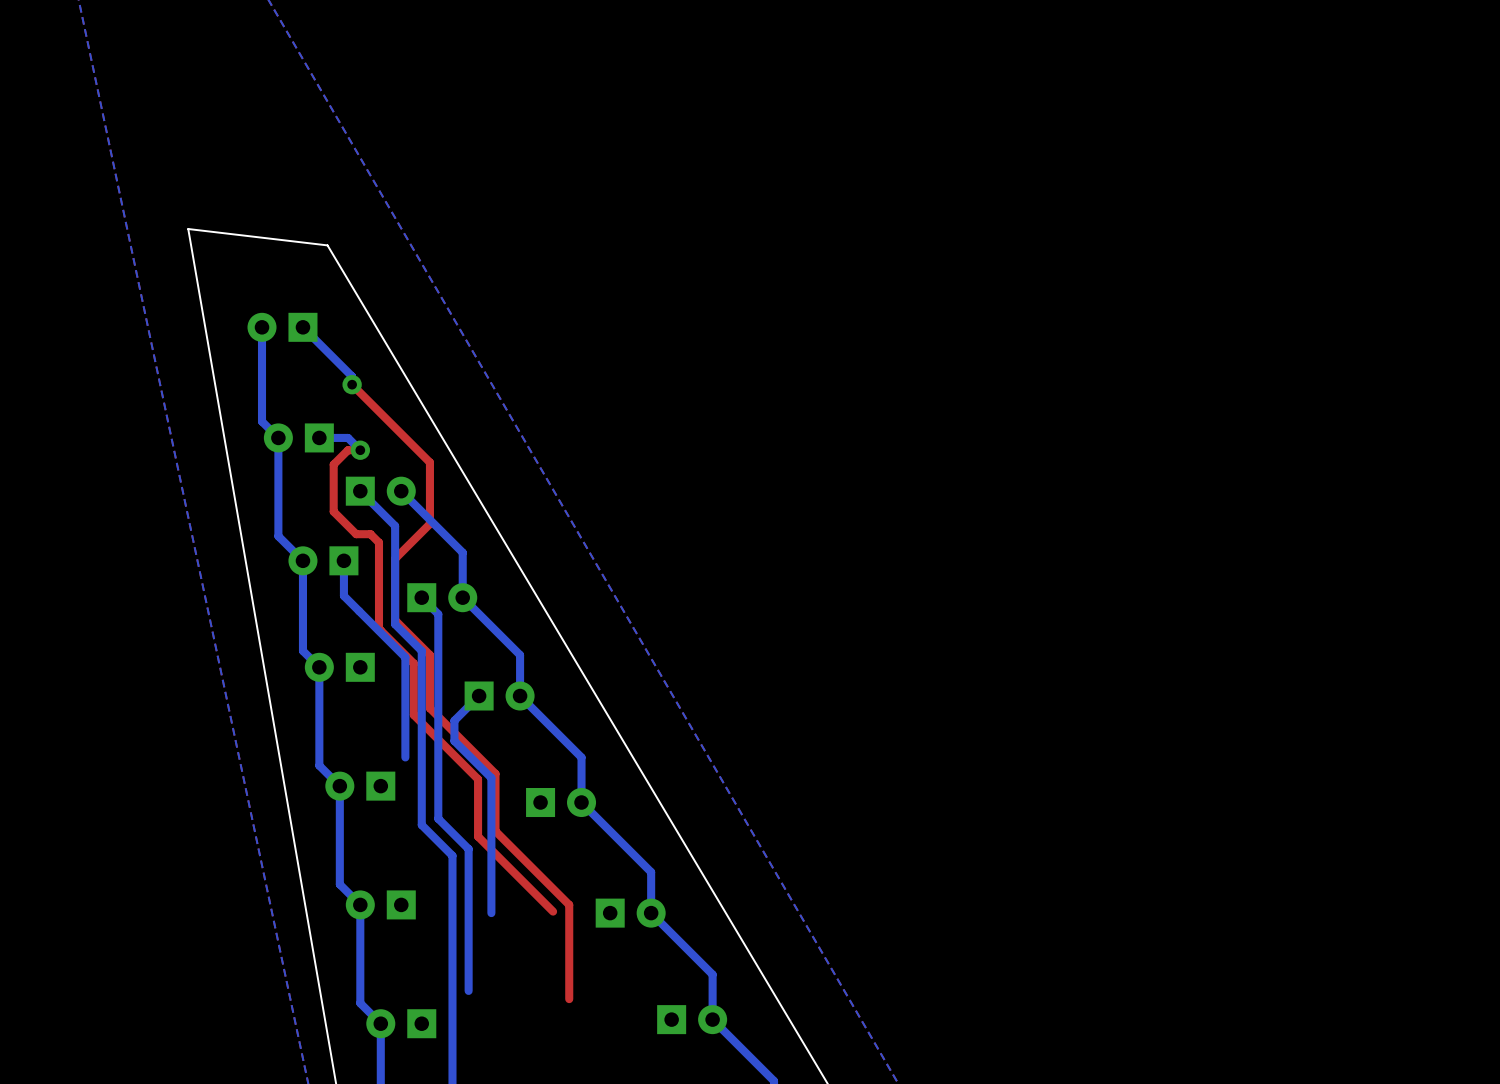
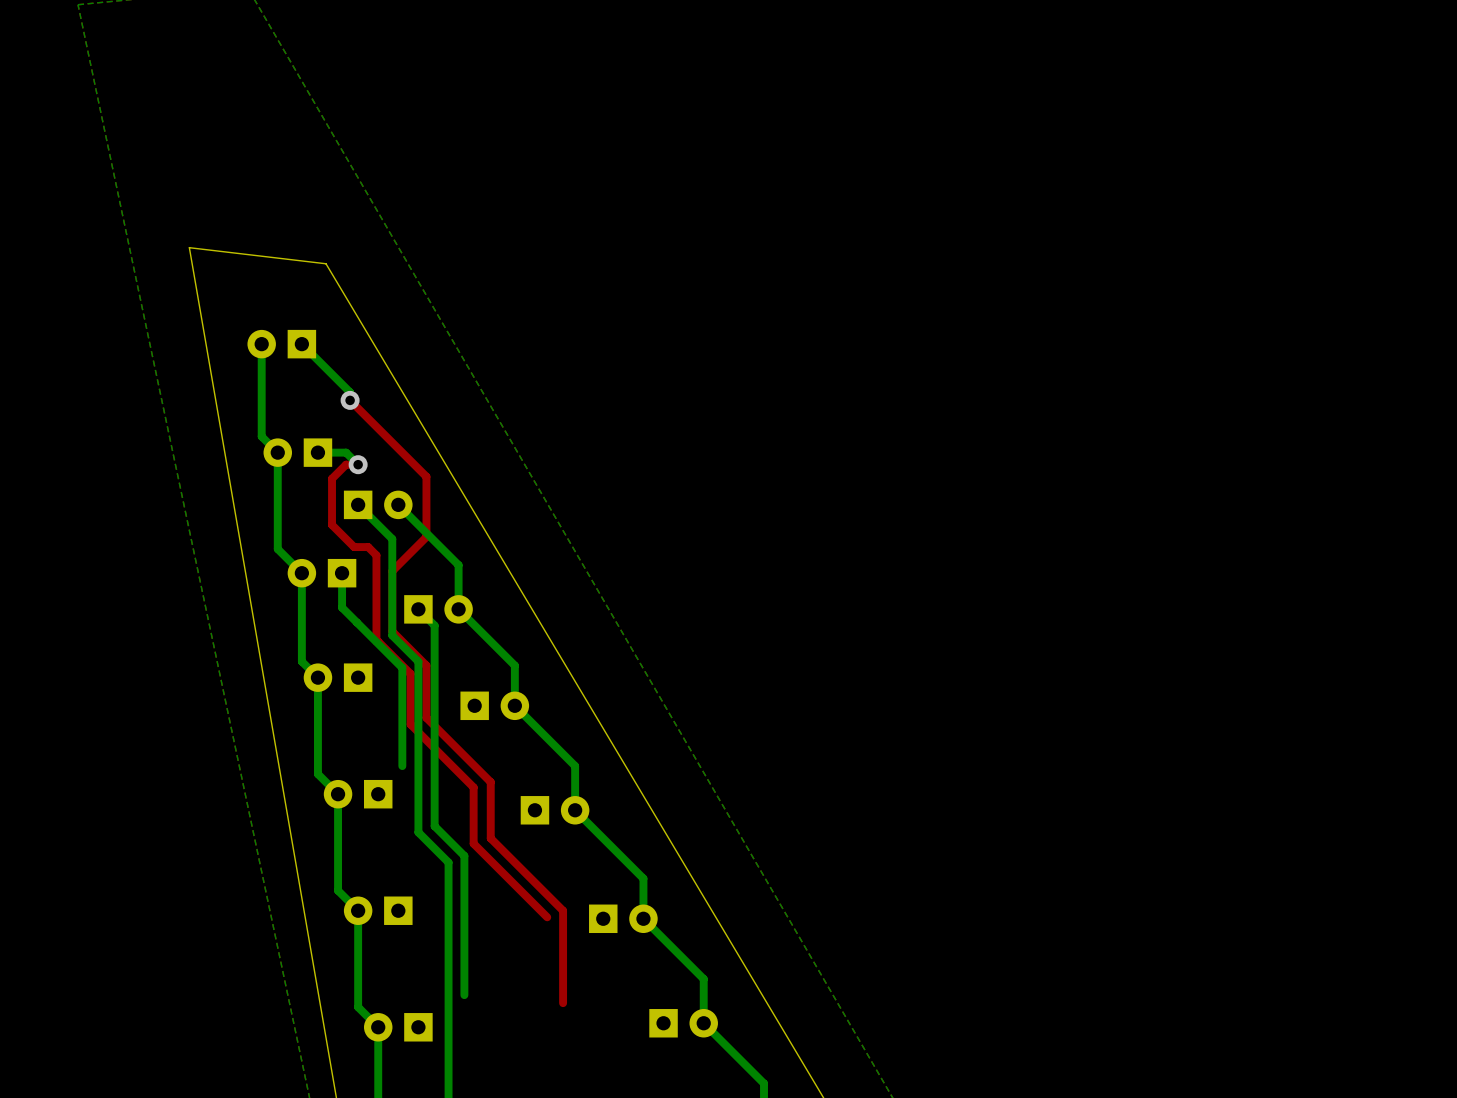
bottom track: (479, 696) (454, 720) (454, 741) (491, 778) (491, 913) -> none

